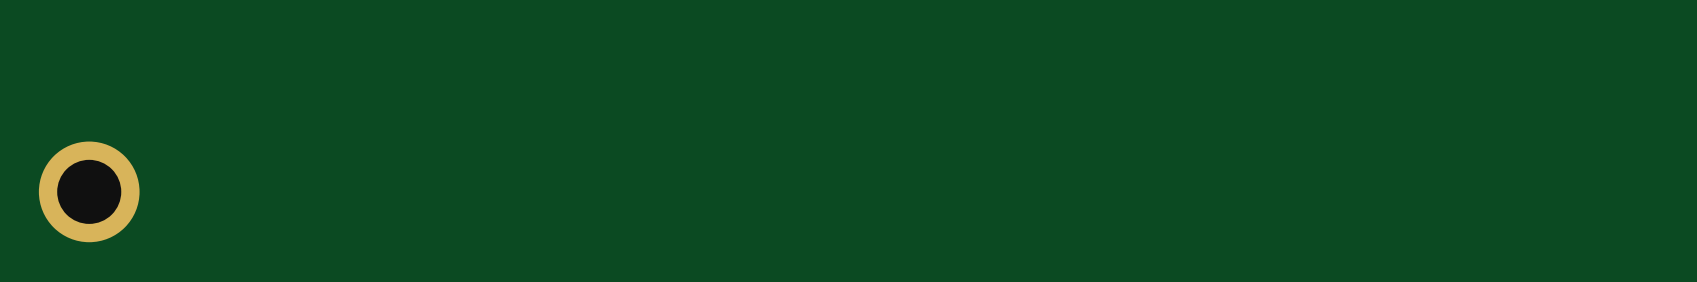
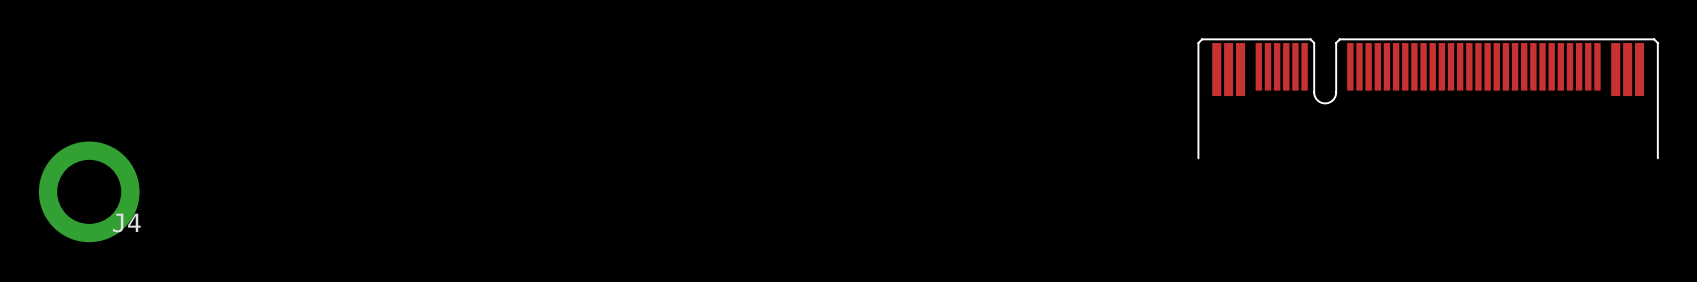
J4: none -> (1428, 98)

